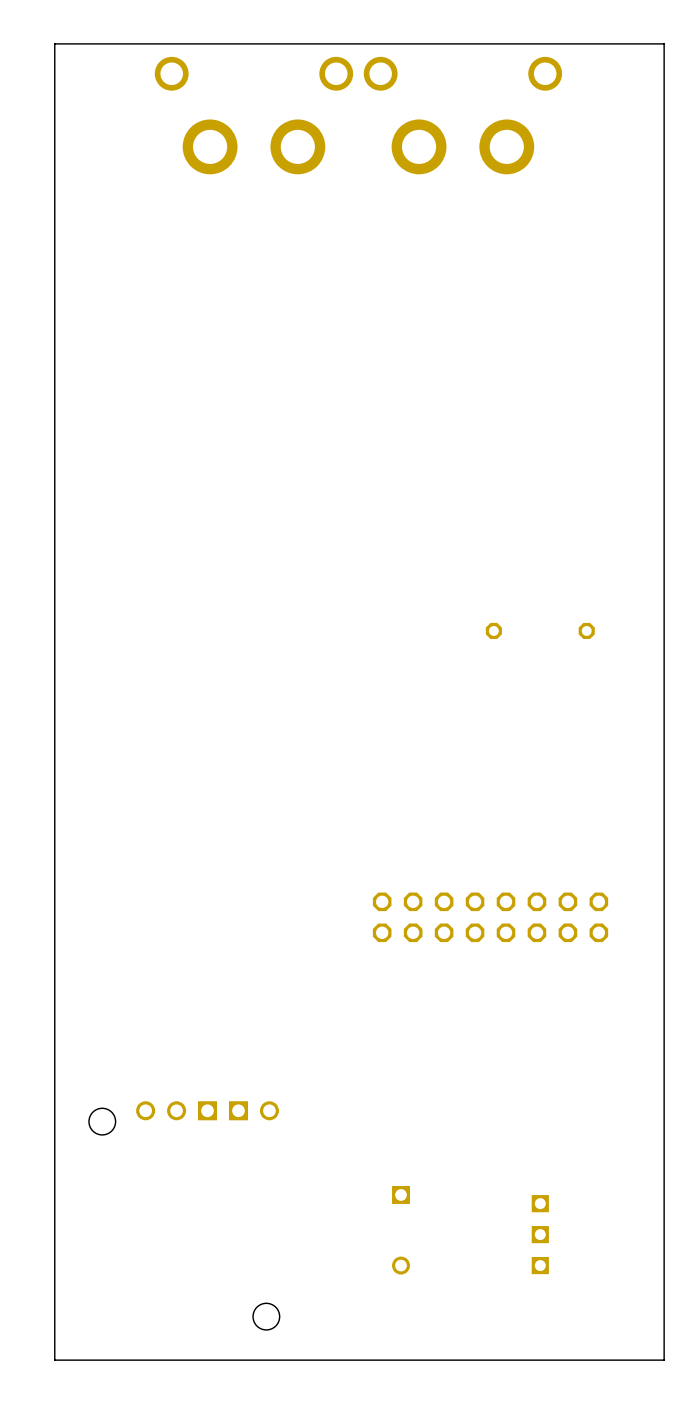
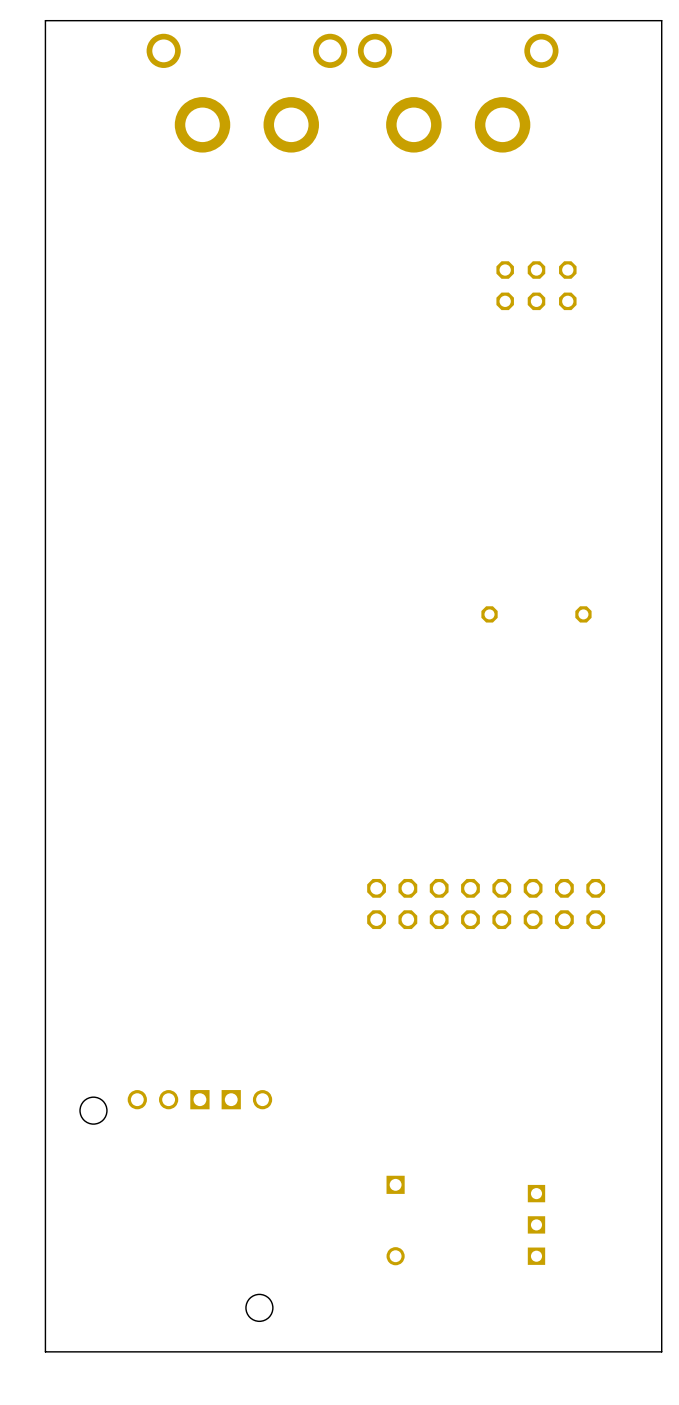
part: none -> (536, 285)

